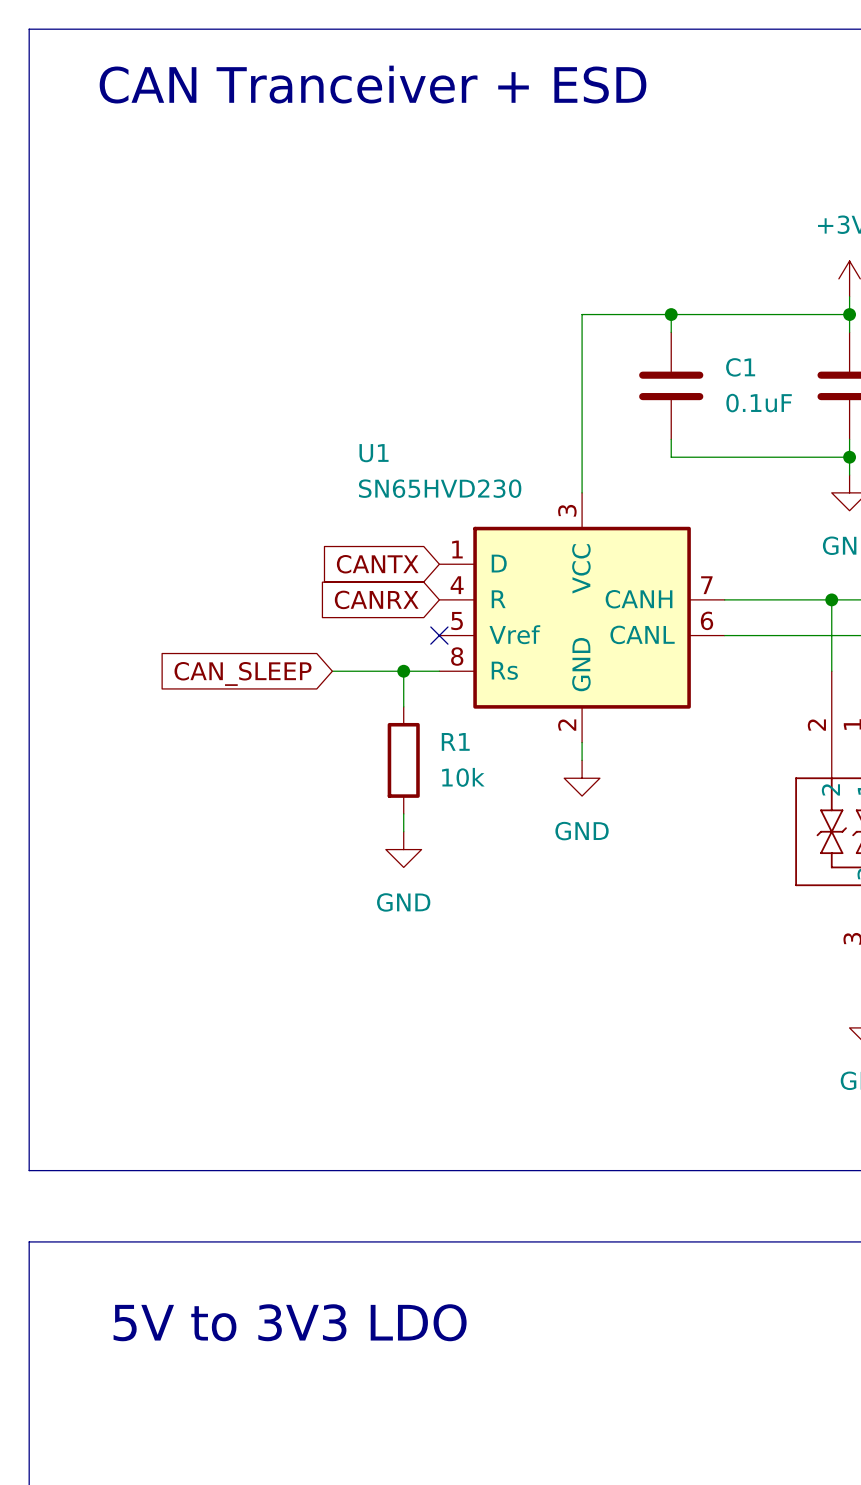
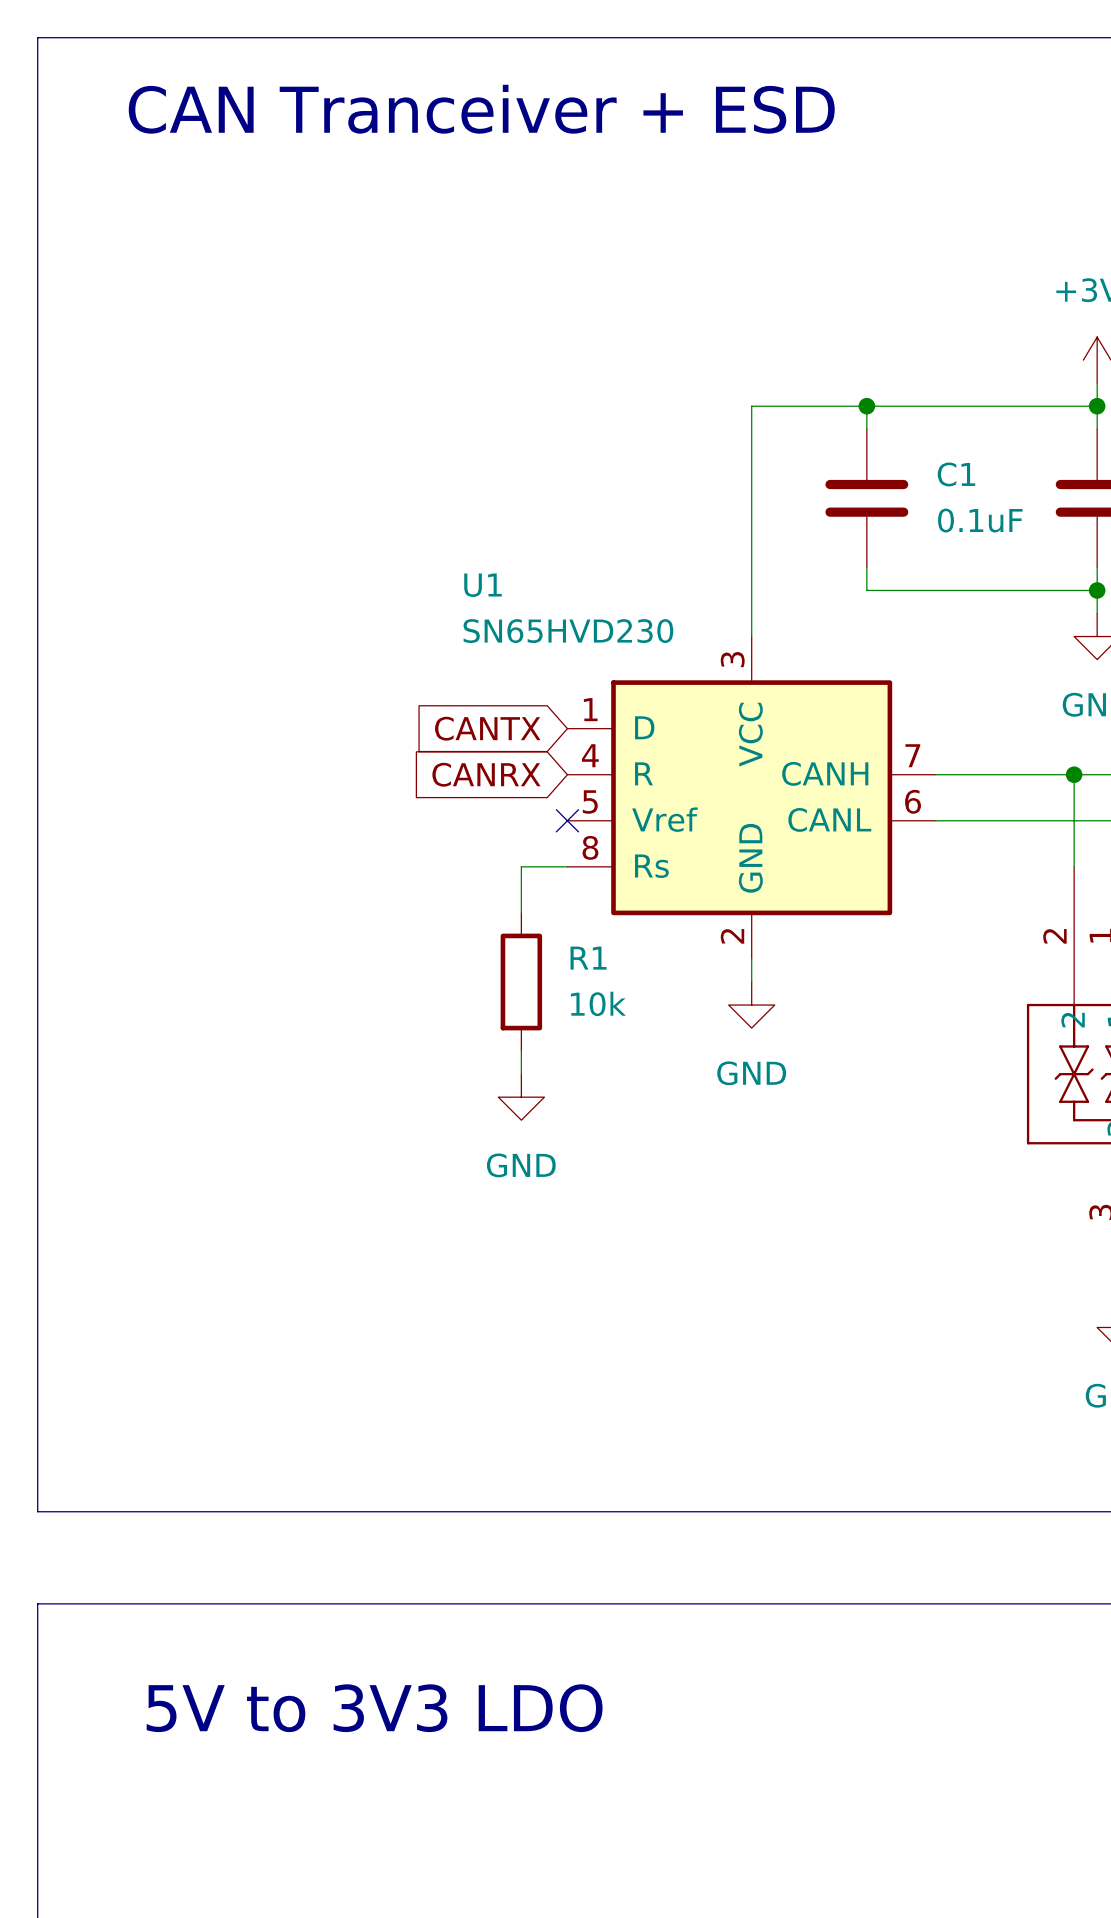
wire: (332, 671) (403, 671) -> none
junction: (403, 671) -> none
global label: CAN_SLEEP (243, 673) -> none

